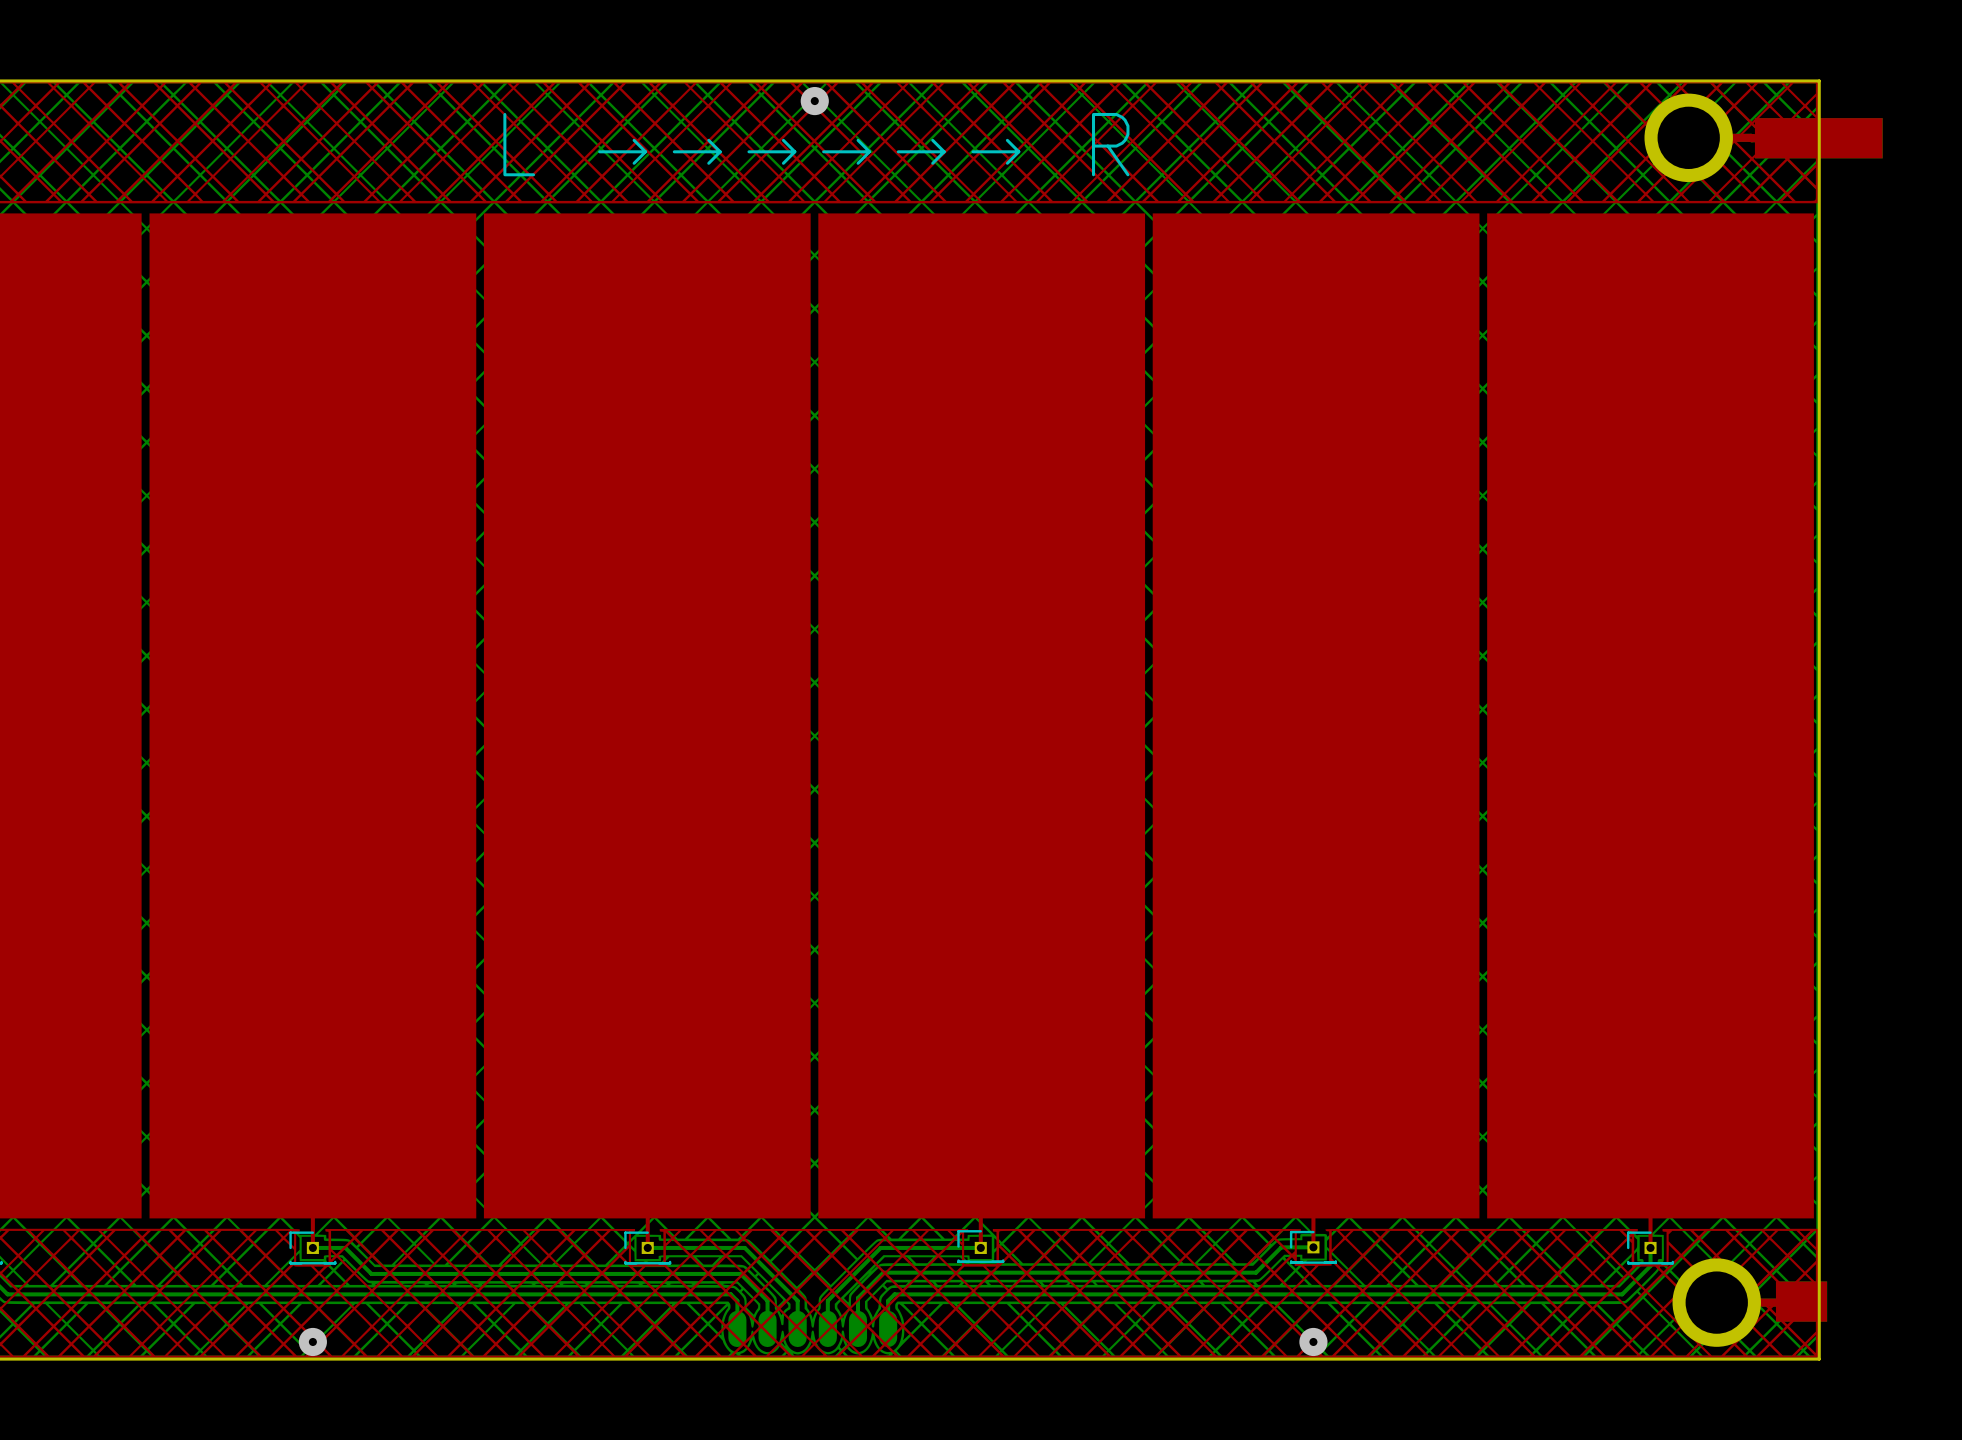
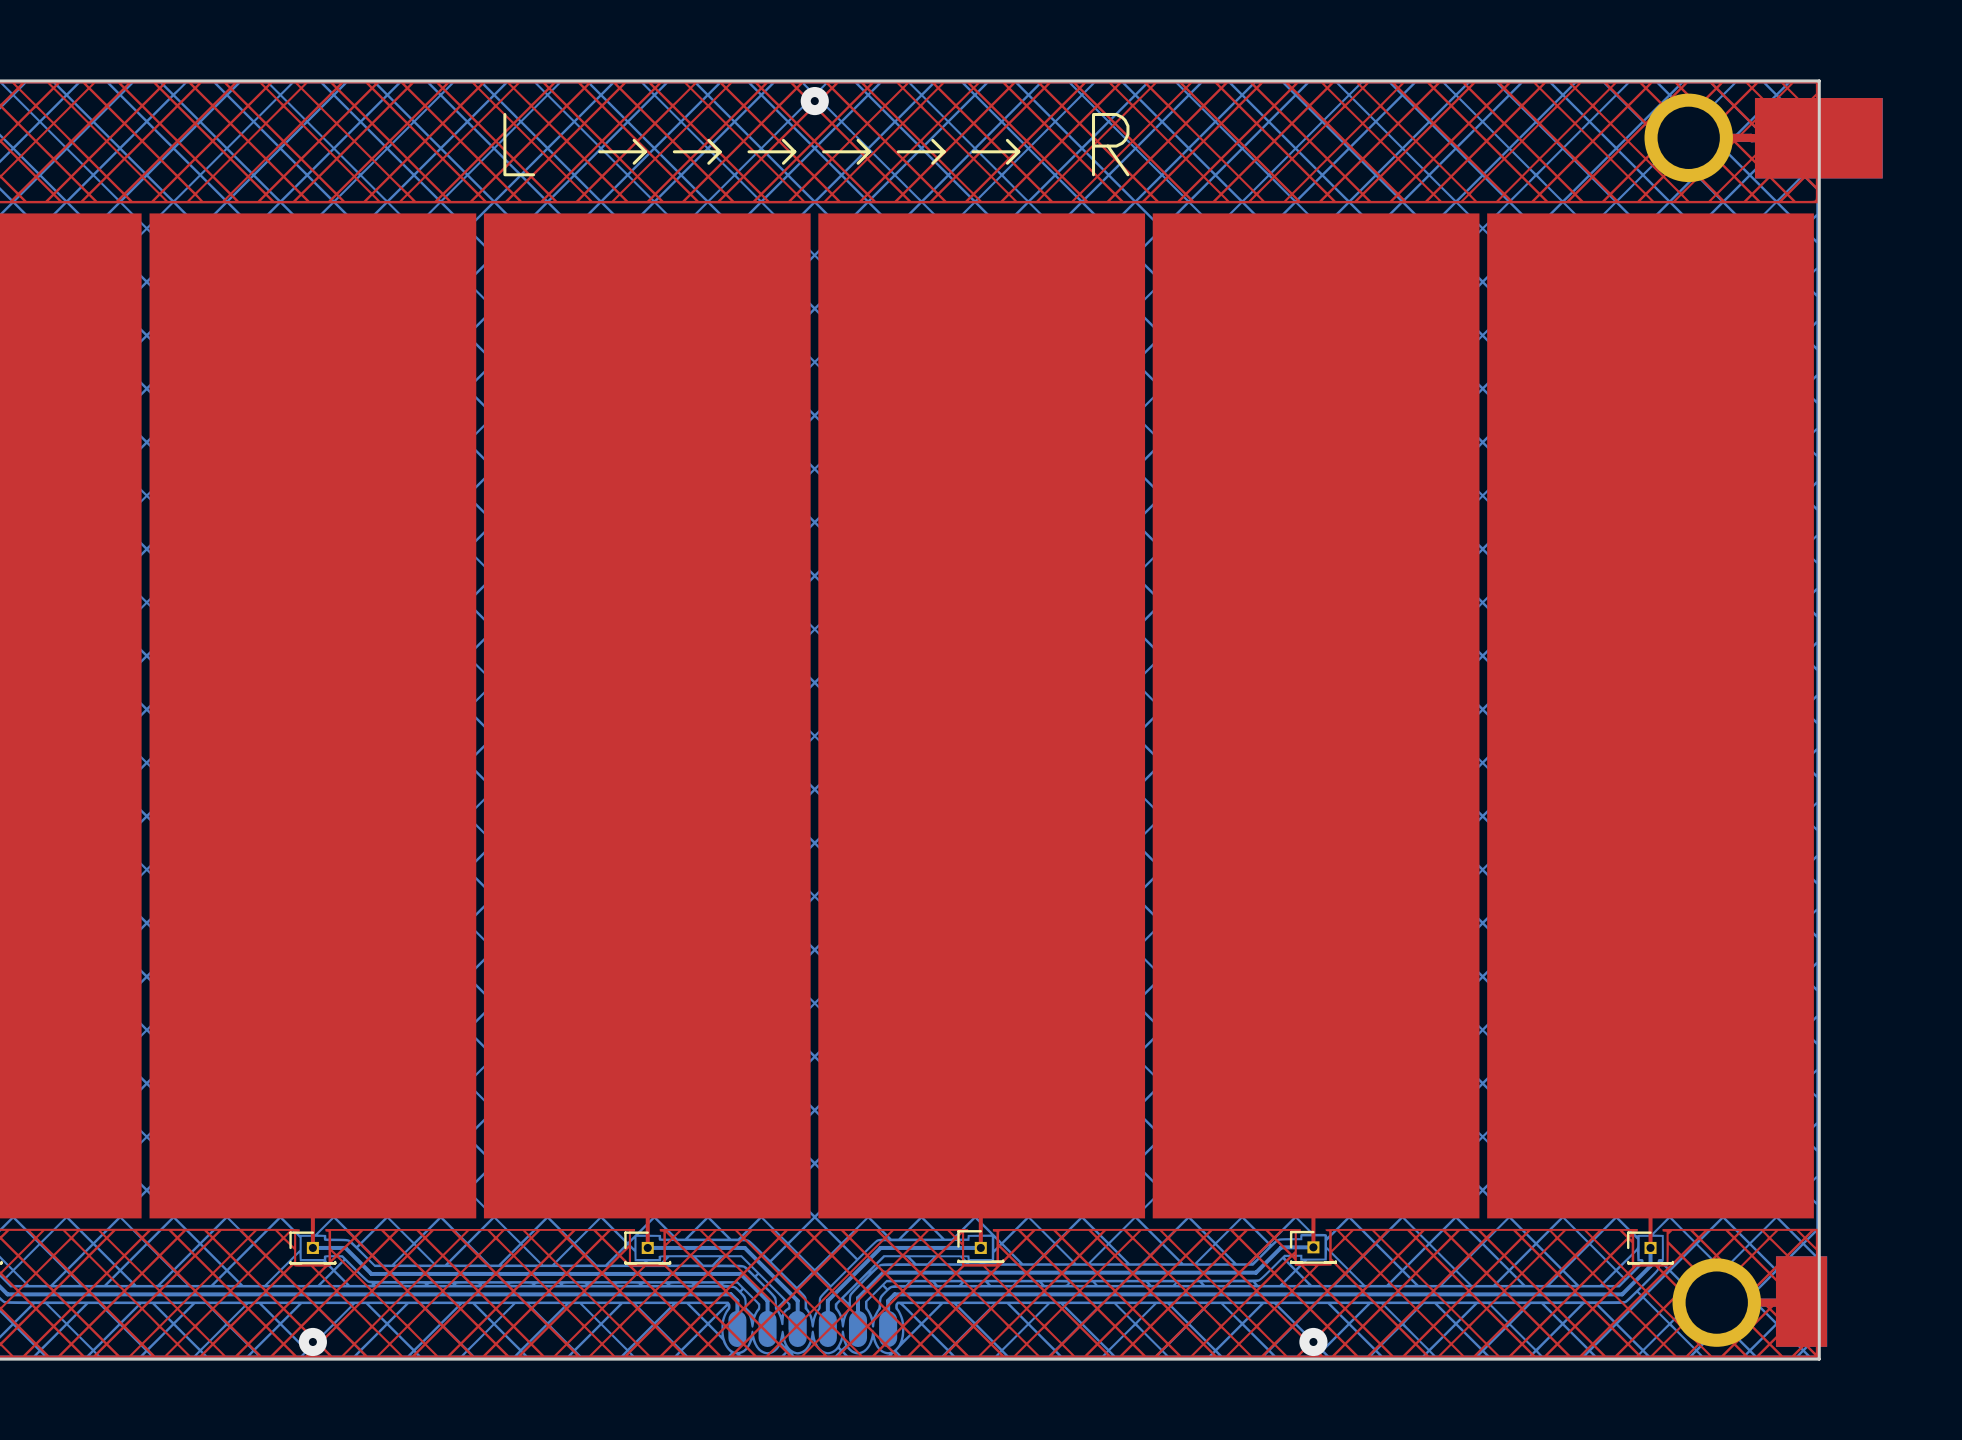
part: (1818, 138) -> none
part: none -> (1818, 138)
part: (1801, 1301) -> none
part: none -> (1801, 1301)

